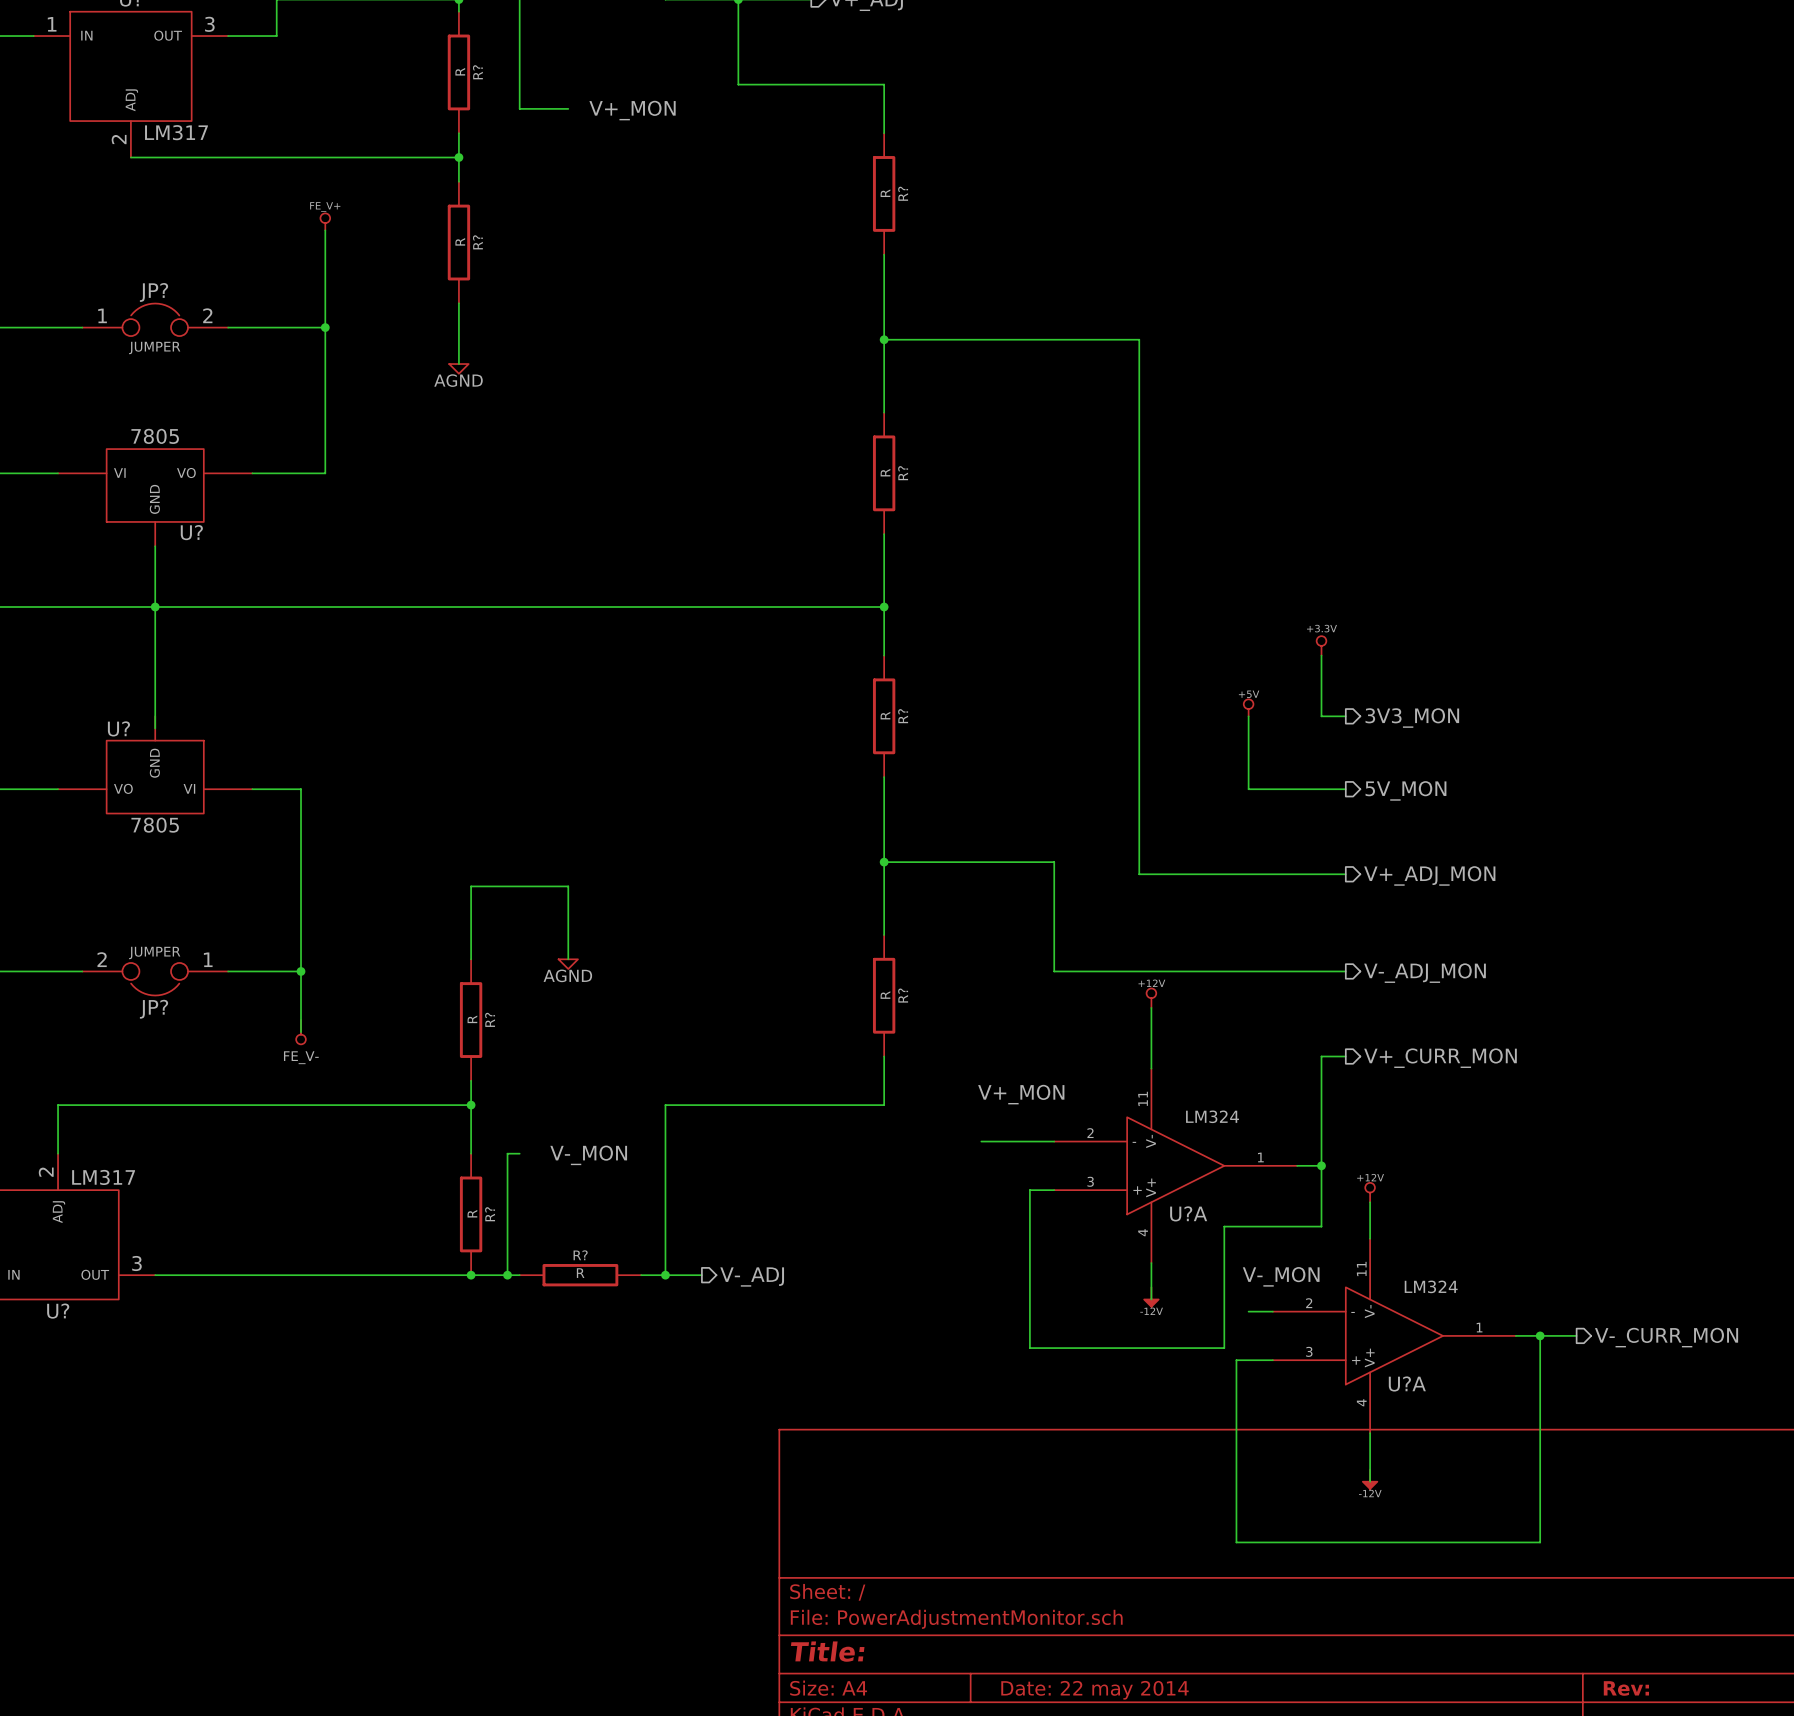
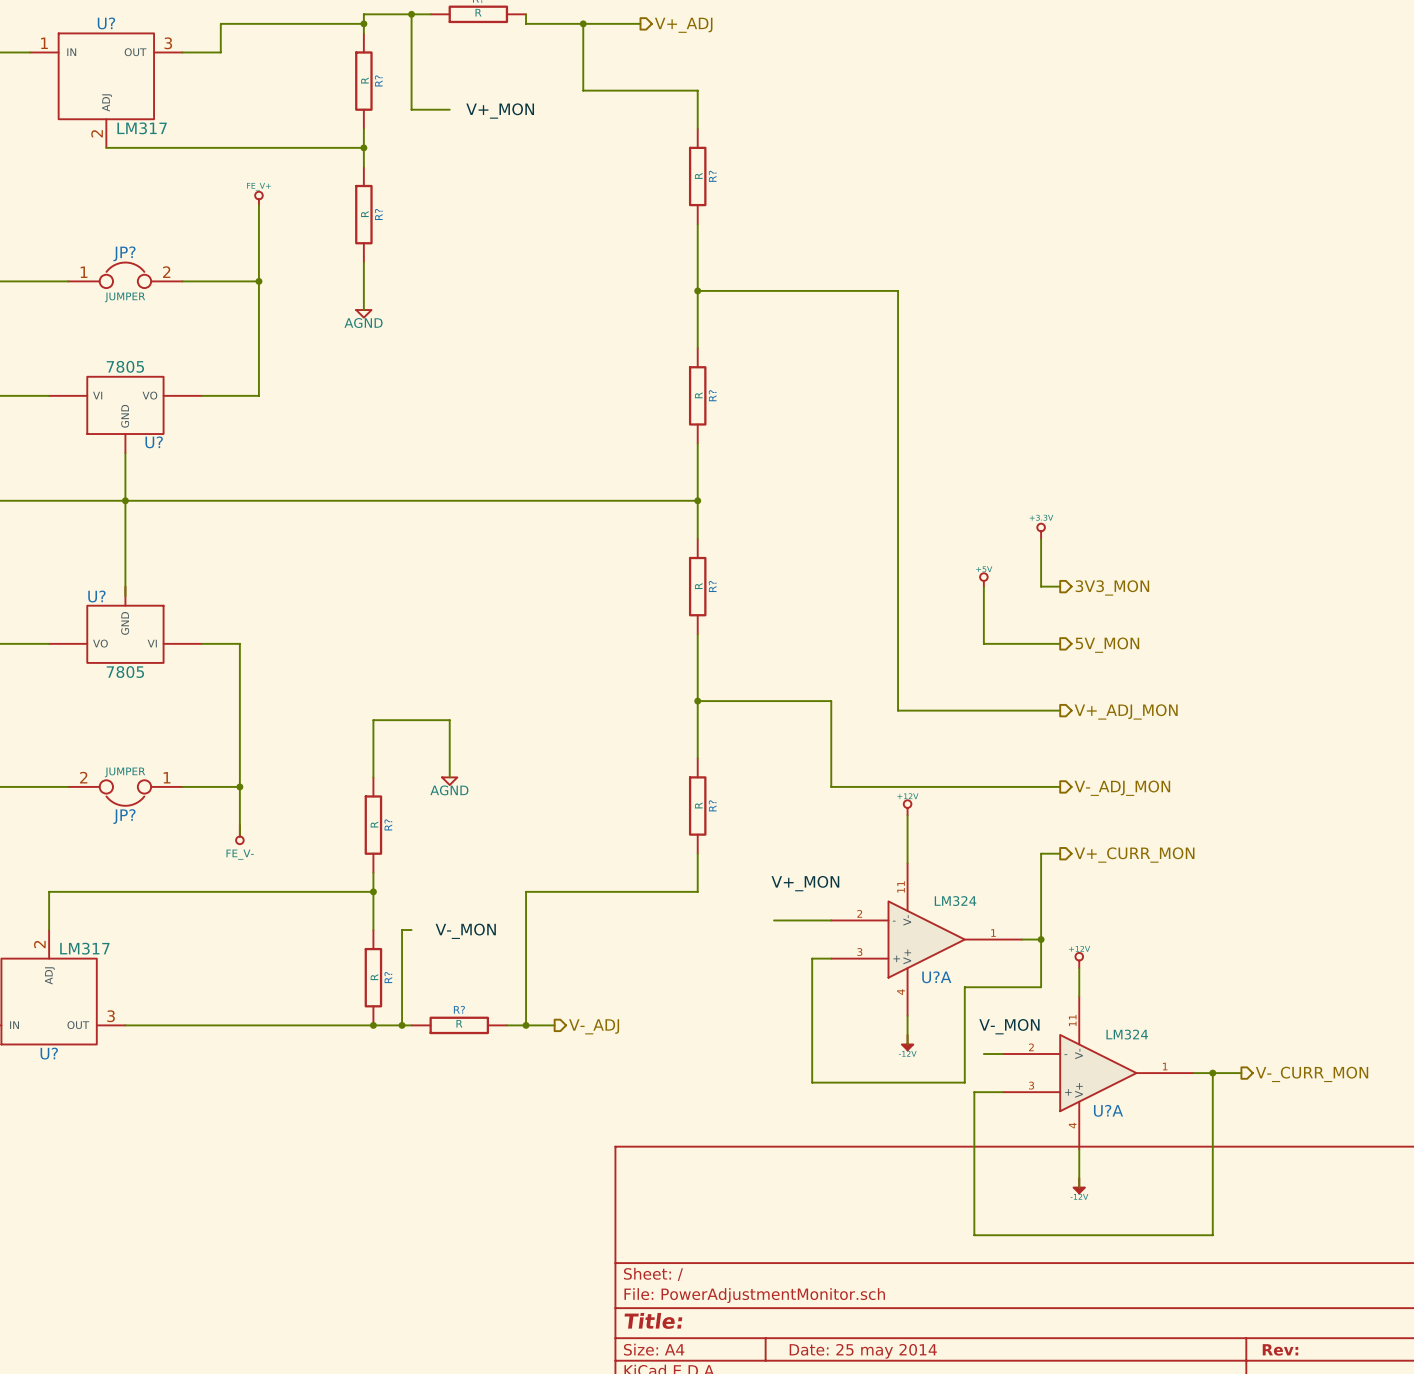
title block: Date: 22 may 2014 (1094, 1690) -> Date: 25 may 2014 (863, 1351)

